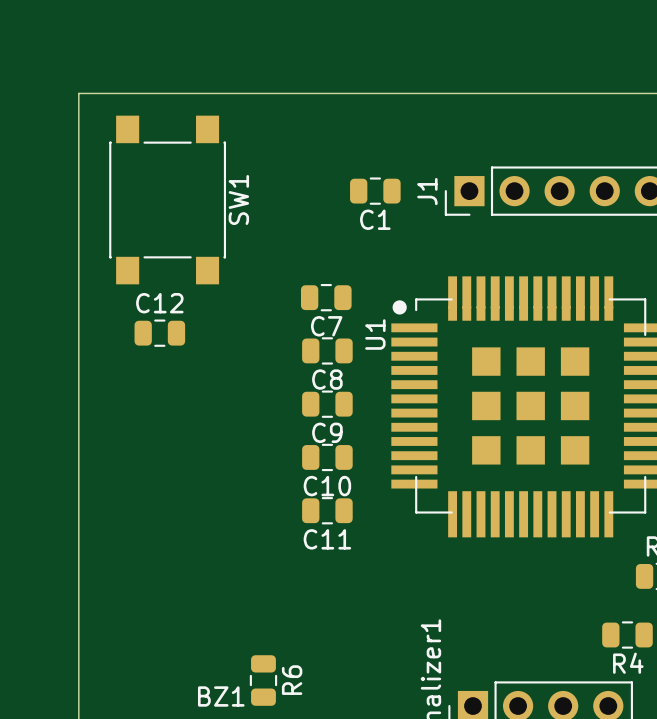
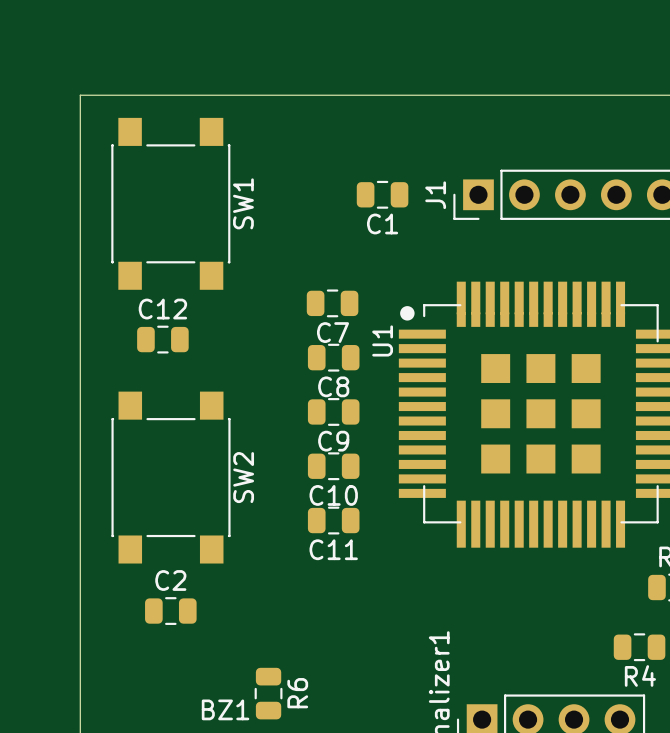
SW2: none -> (171, 477)
C2: none -> (170, 611)

